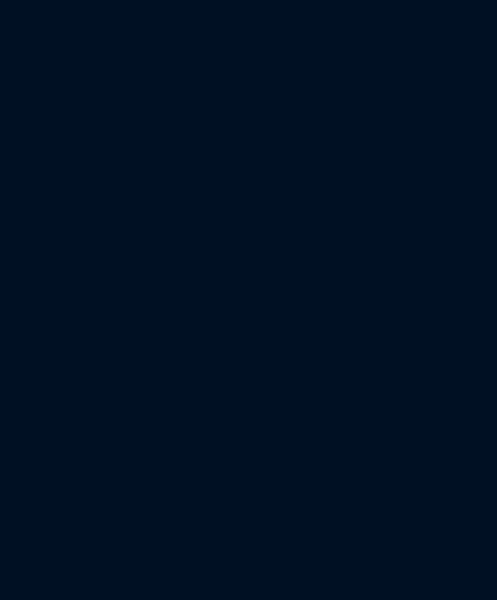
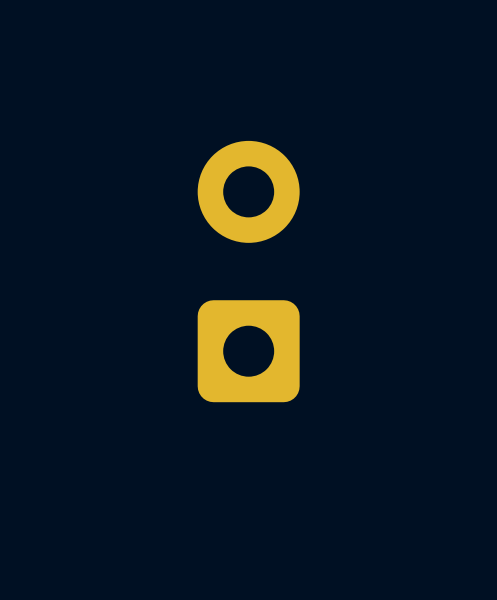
part: none -> (248, 271)

